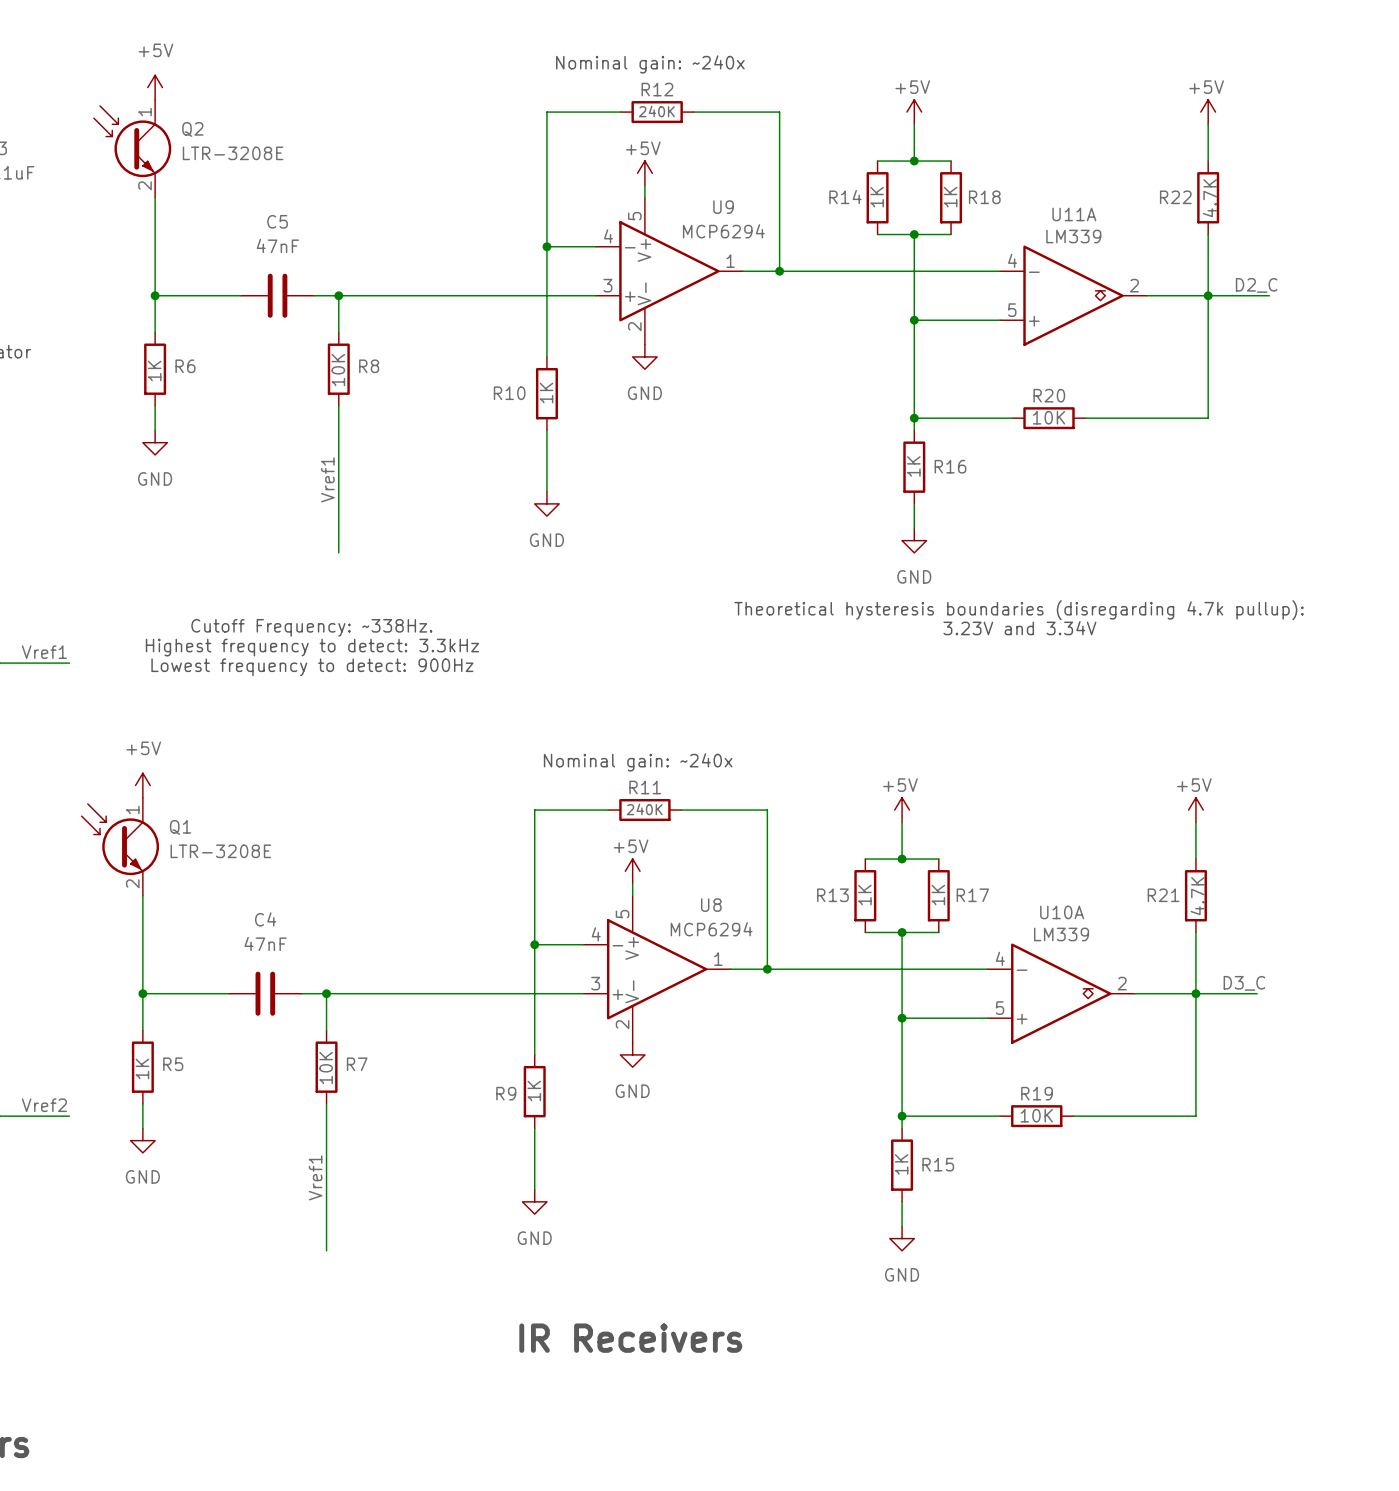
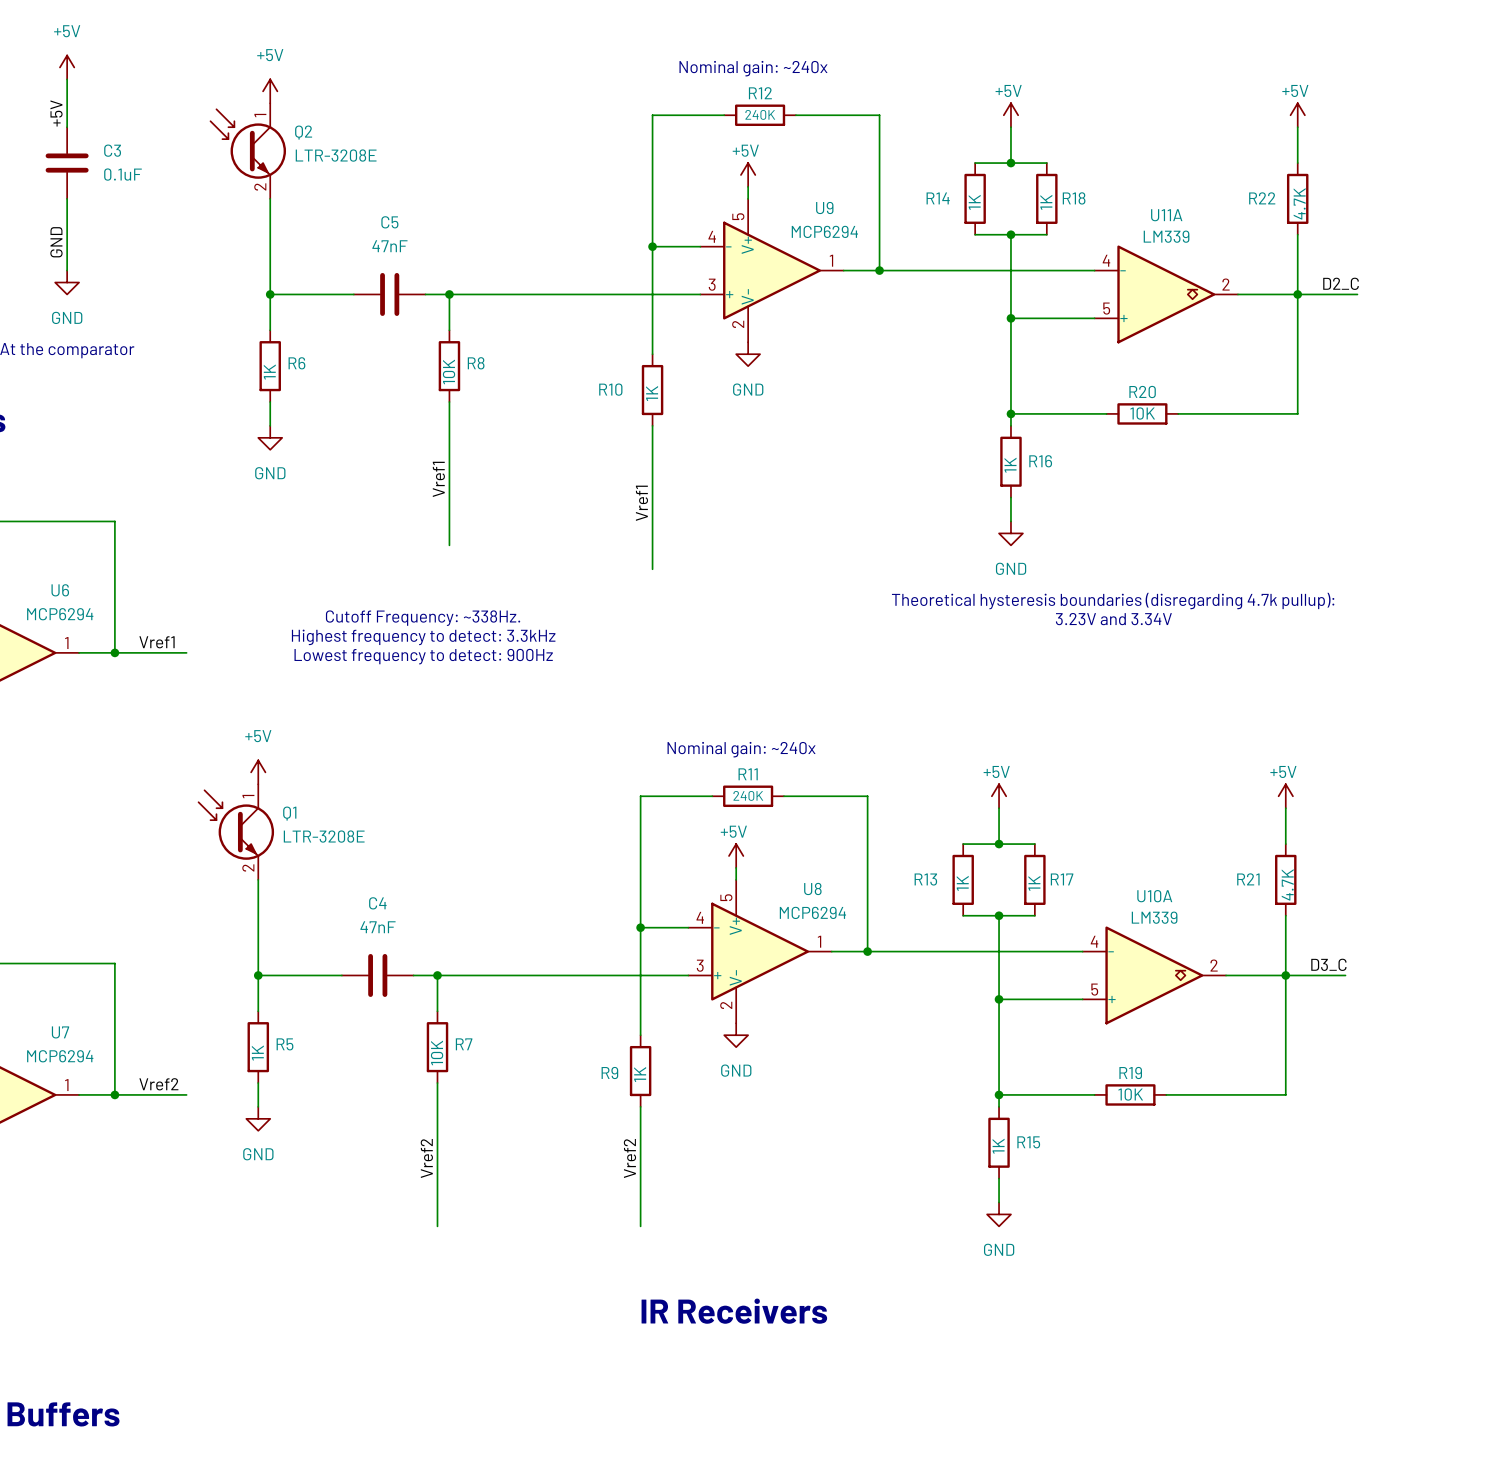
wire: none -> (652, 485) (652, 569)
power symbol: GND (546, 503) -> none
label: none -> Vref1 (641, 503)
label: Vref1 (315, 1177) -> Vref2 (426, 1158)
label: none -> Vref2 (629, 1158)
wire: none -> (640, 1166) (640, 1226)
power symbol: GND (534, 1201) -> none

